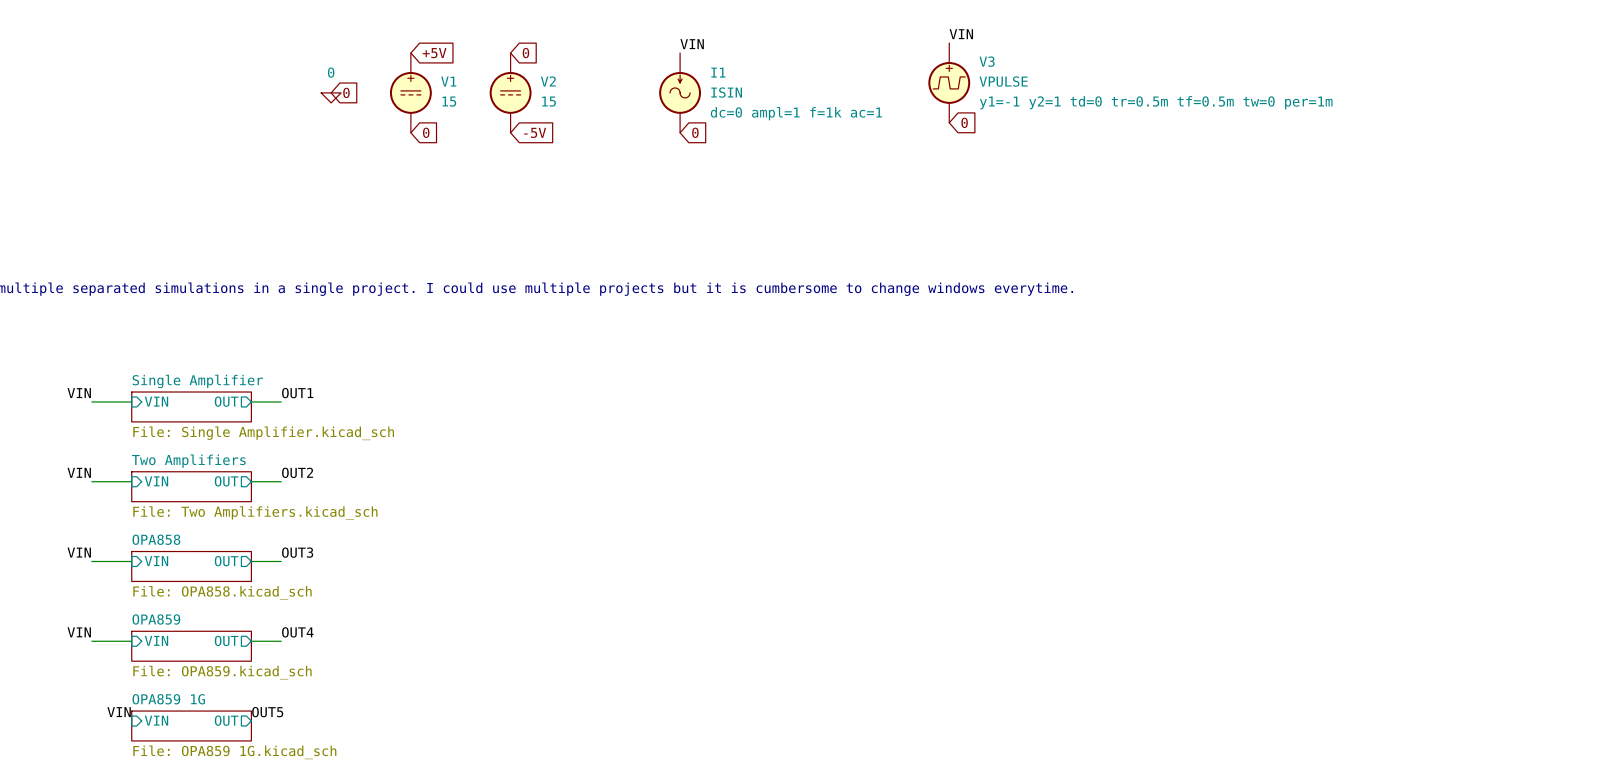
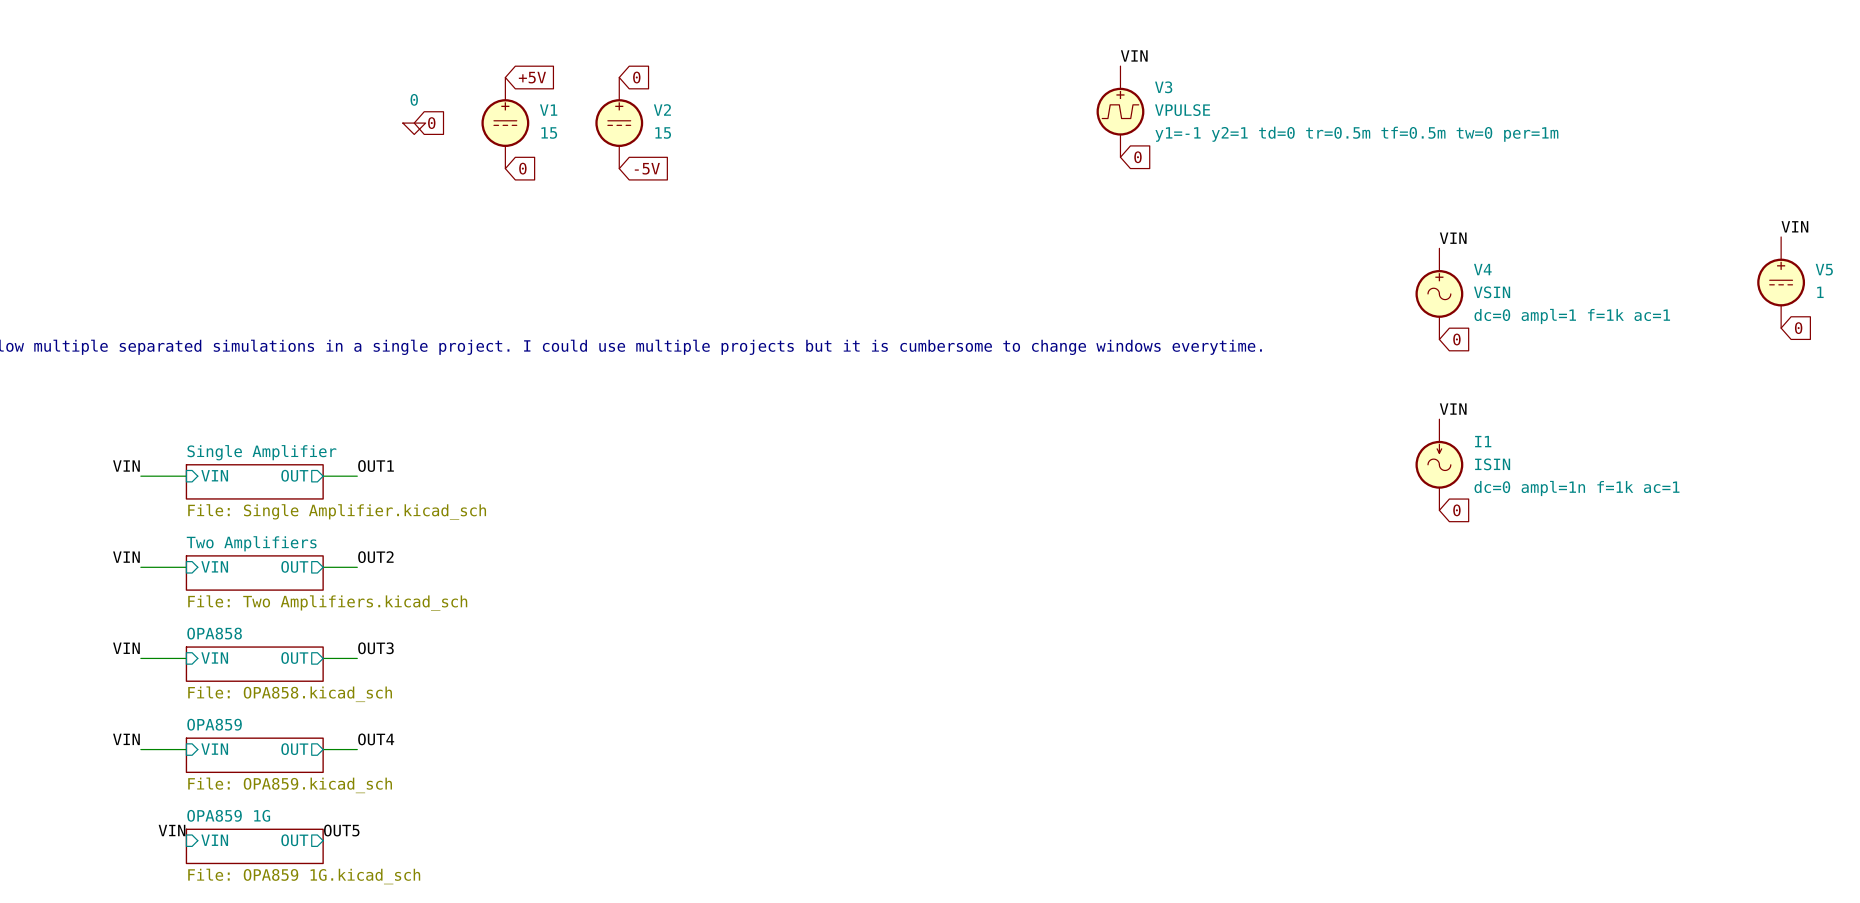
label: VIN (692, 44) -> none
I1 position: (680, 92) -> (1439, 464)
I1 text: dc=0 ampl=1 f=1k ac=1 (796, 113) -> dc=0 ampl=1n f=1k ac=1 (1576, 488)
global label: 0 (695, 132) -> none
label: none -> VIN (1794, 226)
label: none -> VIN (1453, 238)
V5: none -> 1 (1781, 282)
V4: none -> VSIN (1439, 293)
global label: none -> 0 (1798, 328)
global label: none -> 0 (1456, 339)
label: none -> VIN (1453, 409)
global label: none -> 0 (1456, 510)

